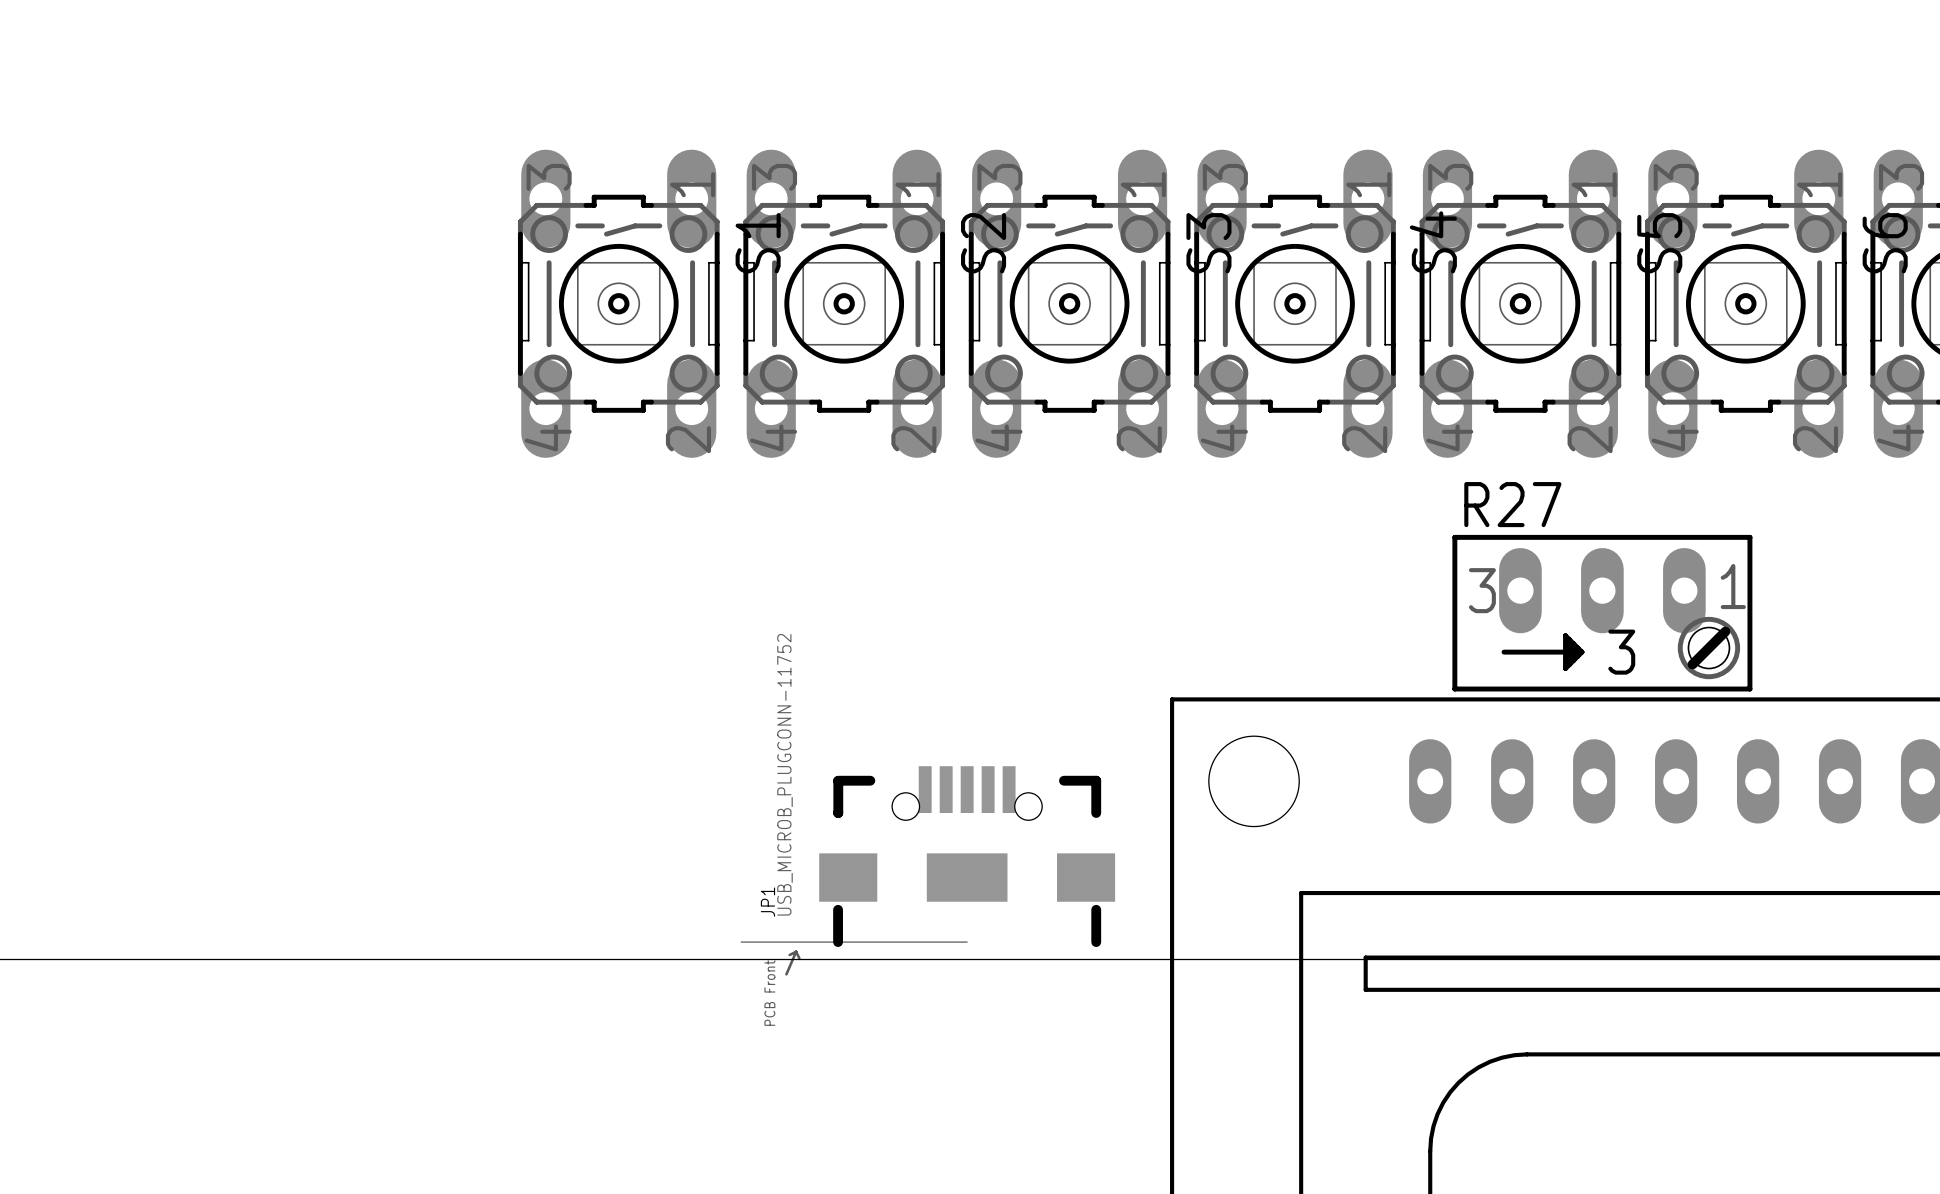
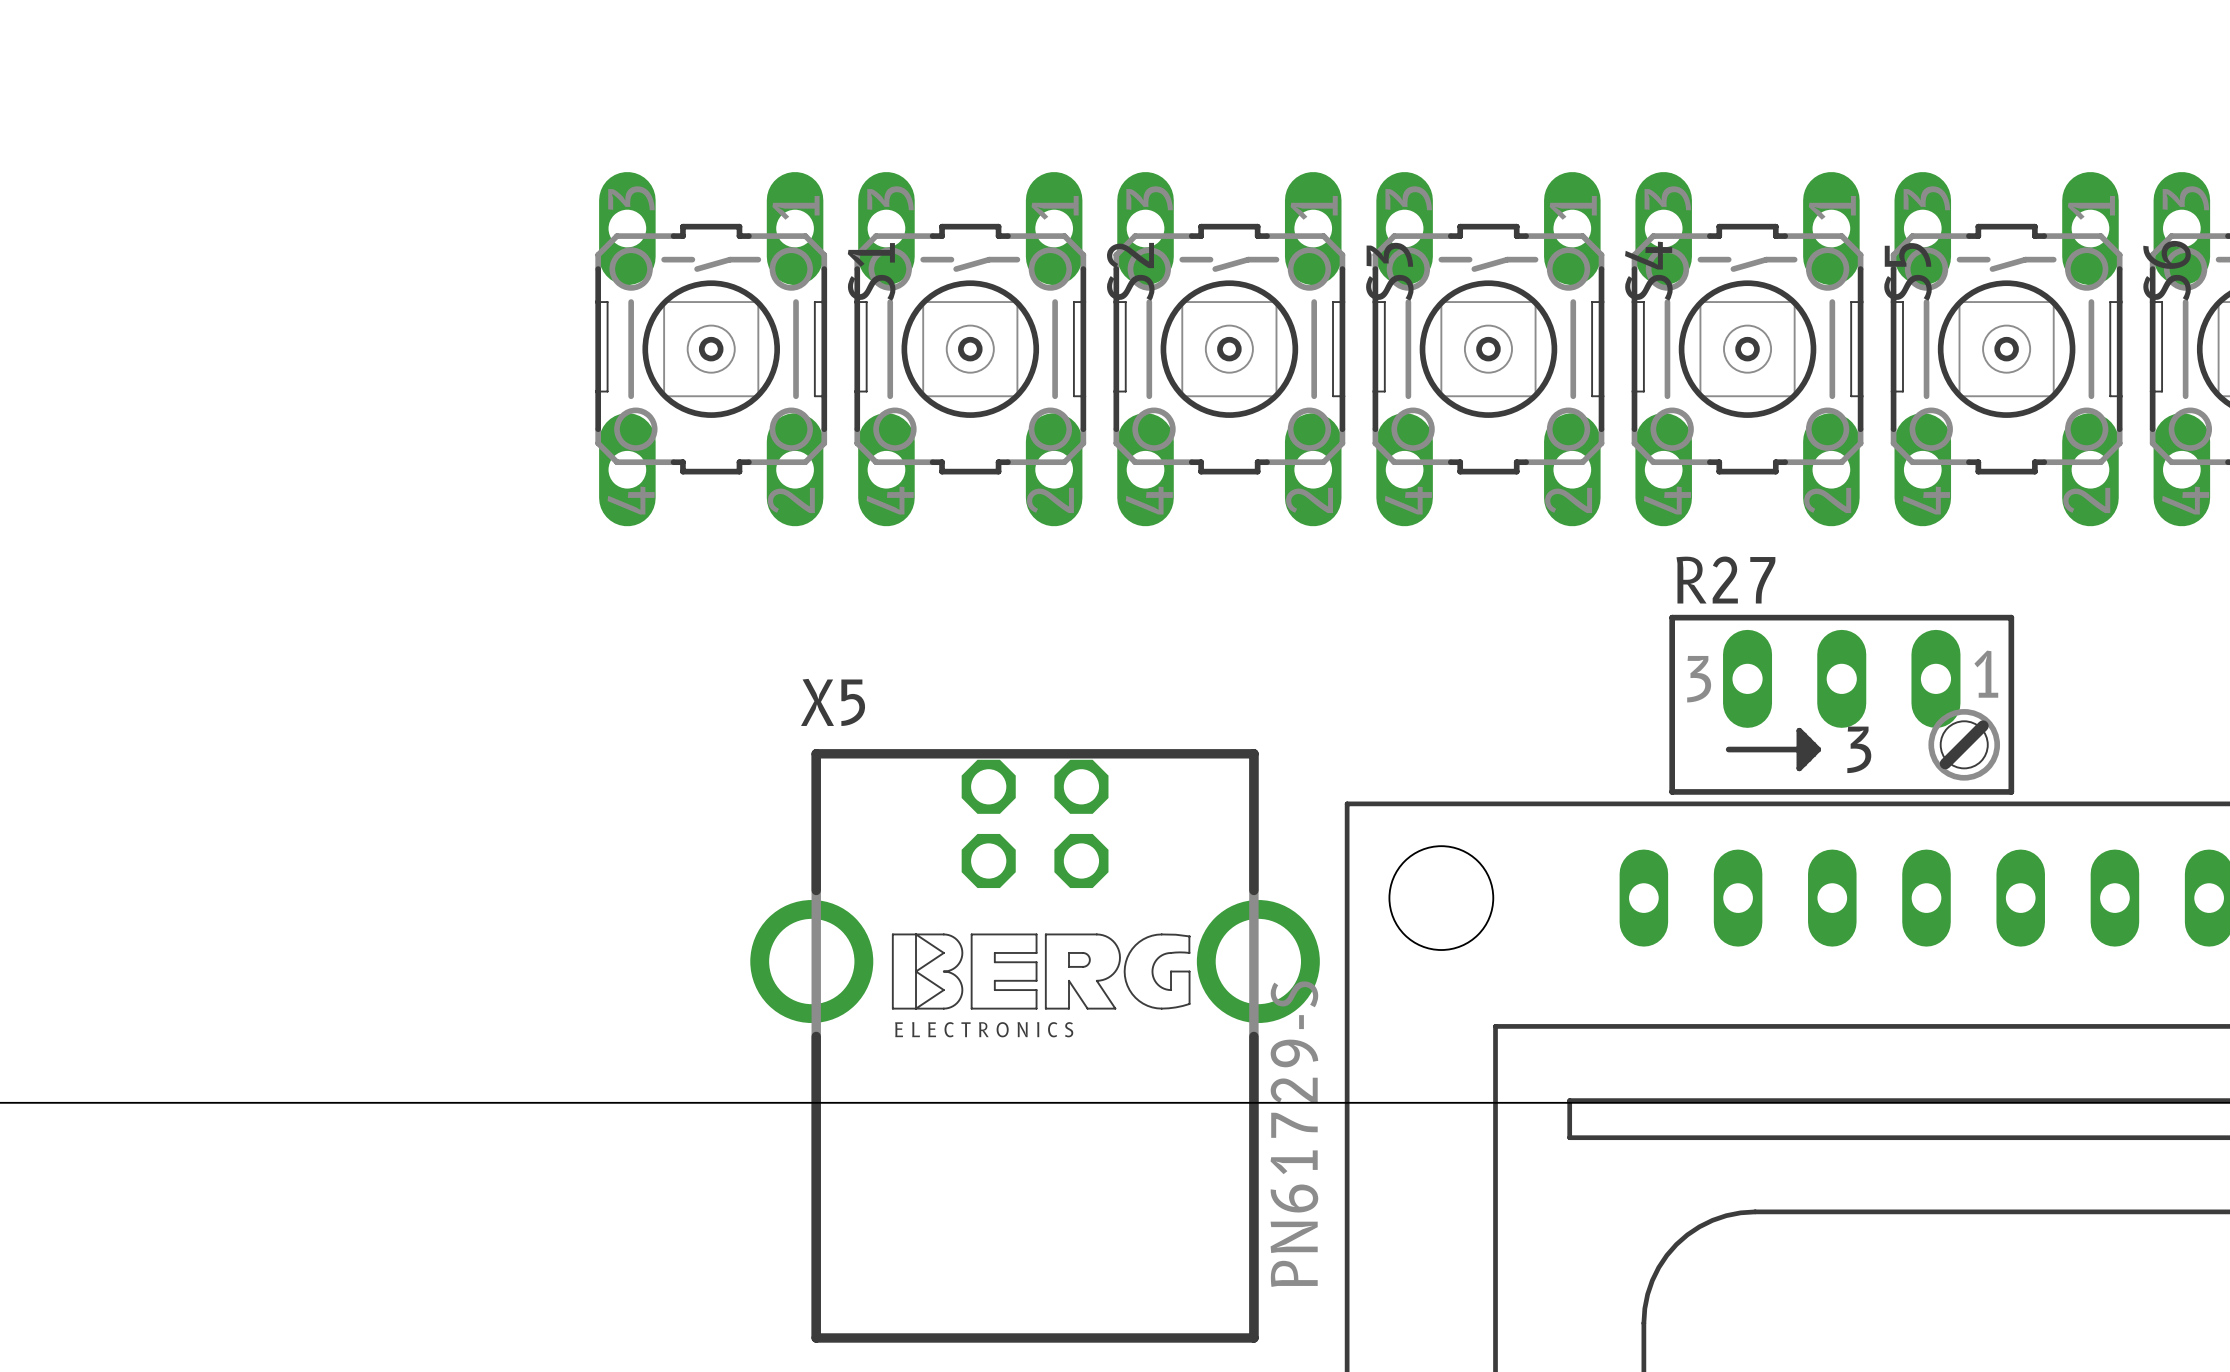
JP1: USB_MICROB_PLUGCONN-11752 (928, 870) -> none
X5: none -> PN61729-S (1035, 1045)

